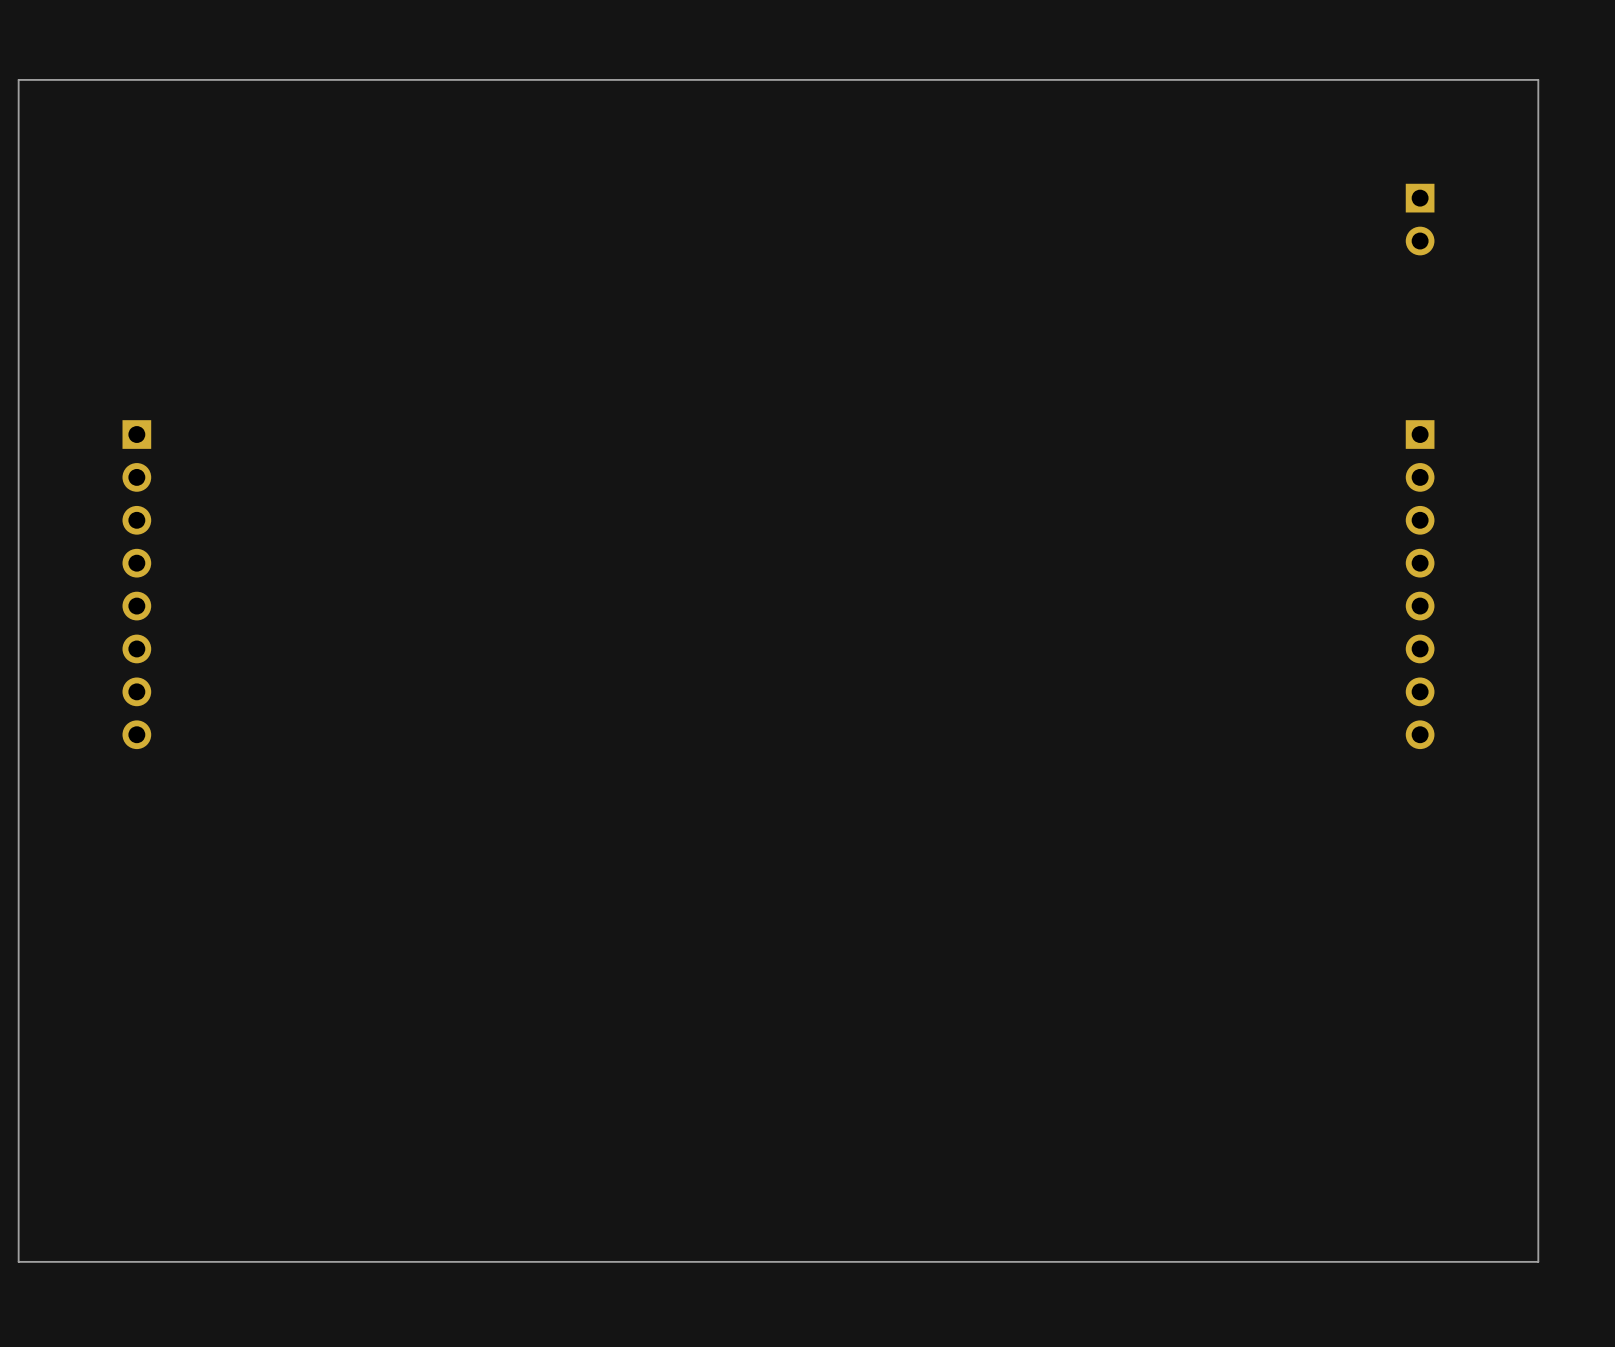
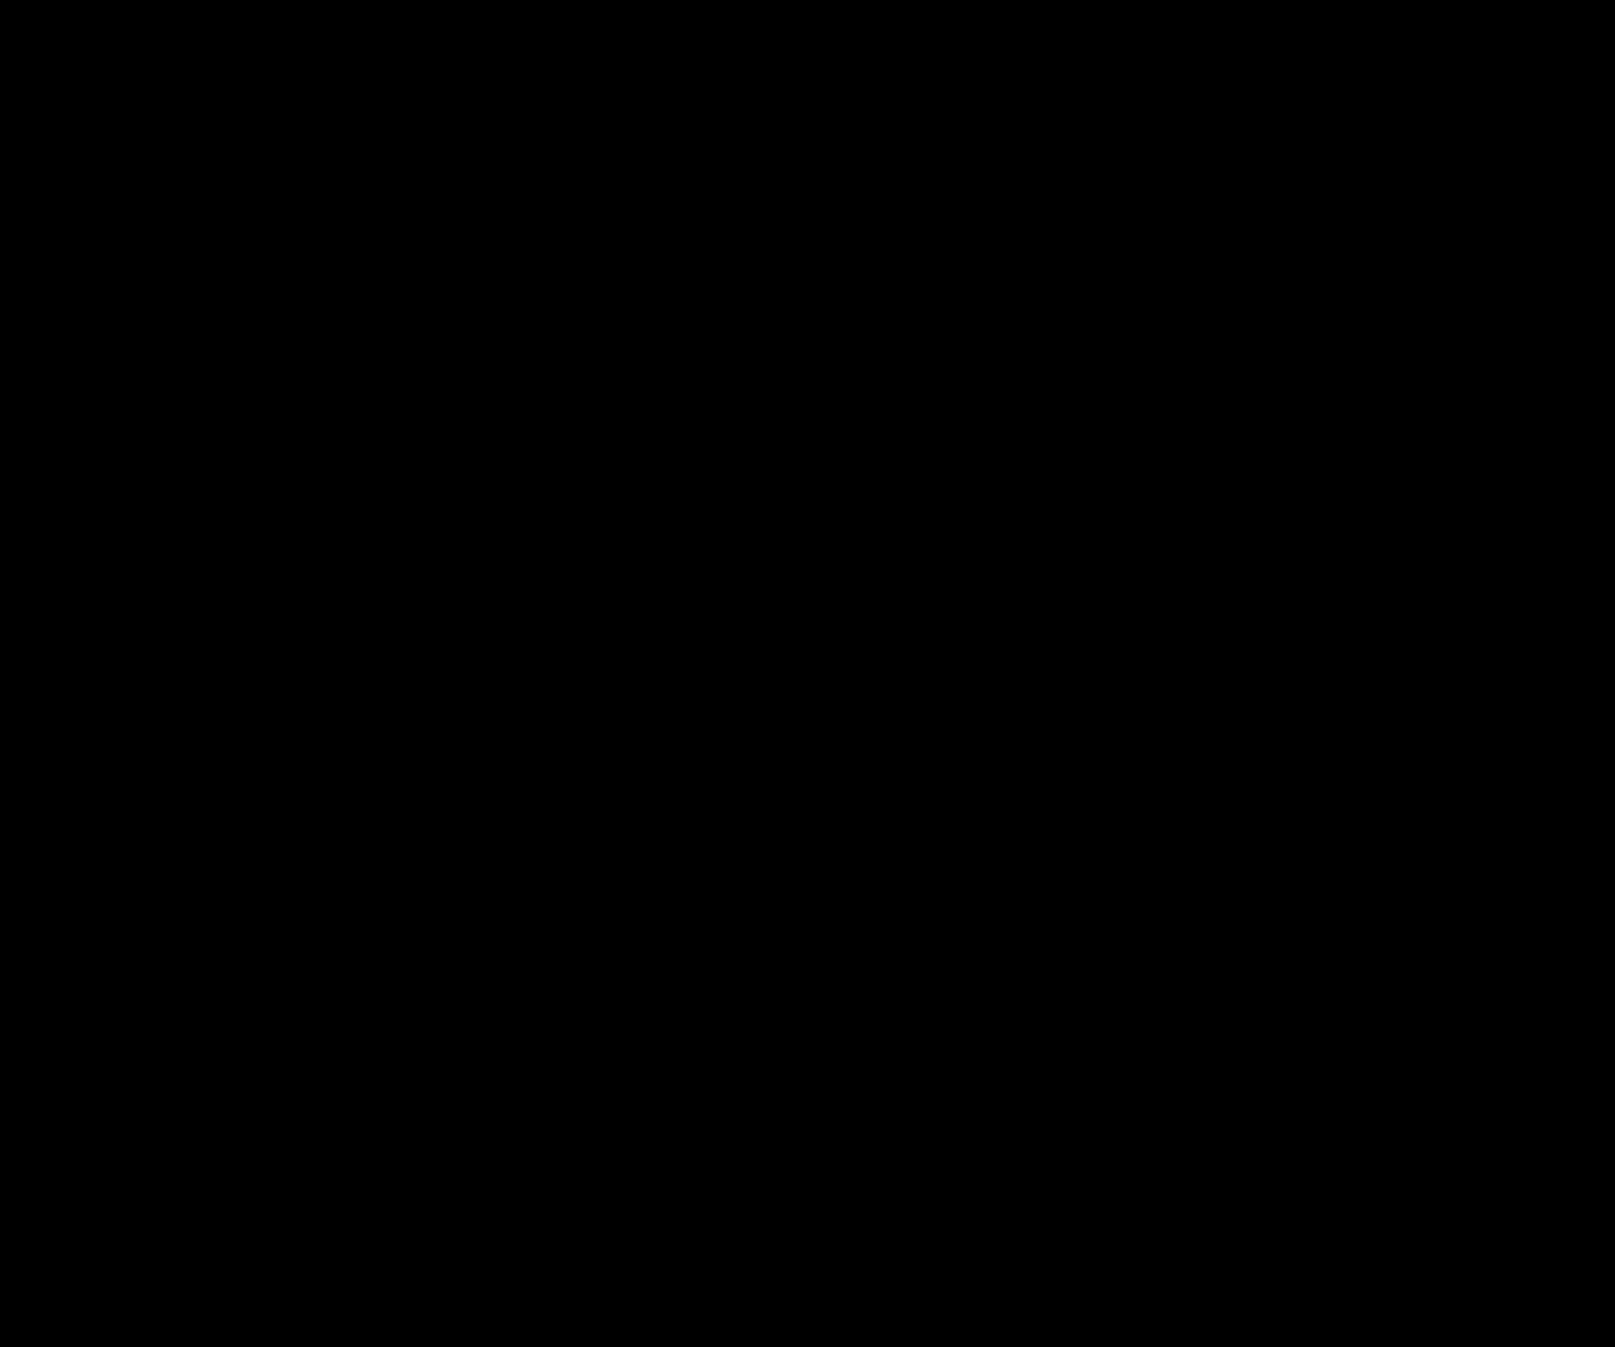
board edge: (1538, 79) (18, 79) (18, 1261) (1538, 1261) (1538, 79) -> none
part: (1420, 219) -> none
part: (136, 584) -> none
part: (1420, 584) -> none

